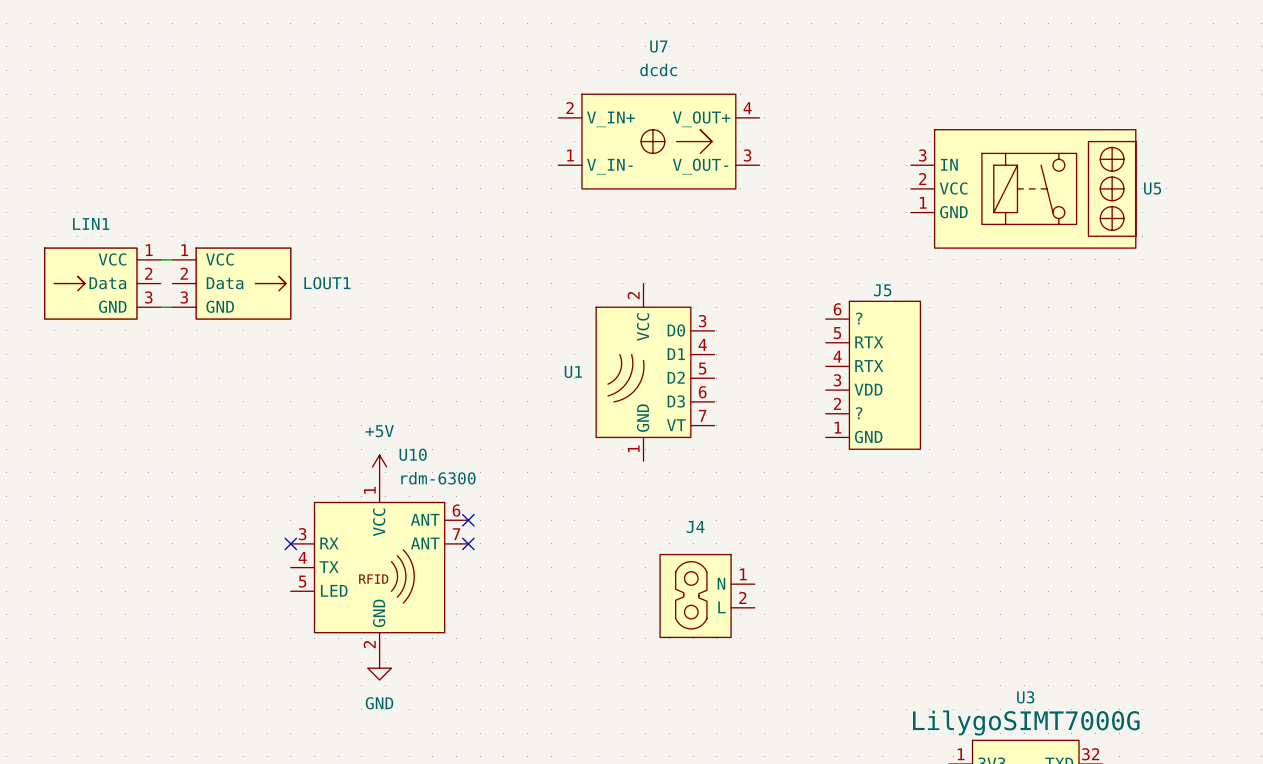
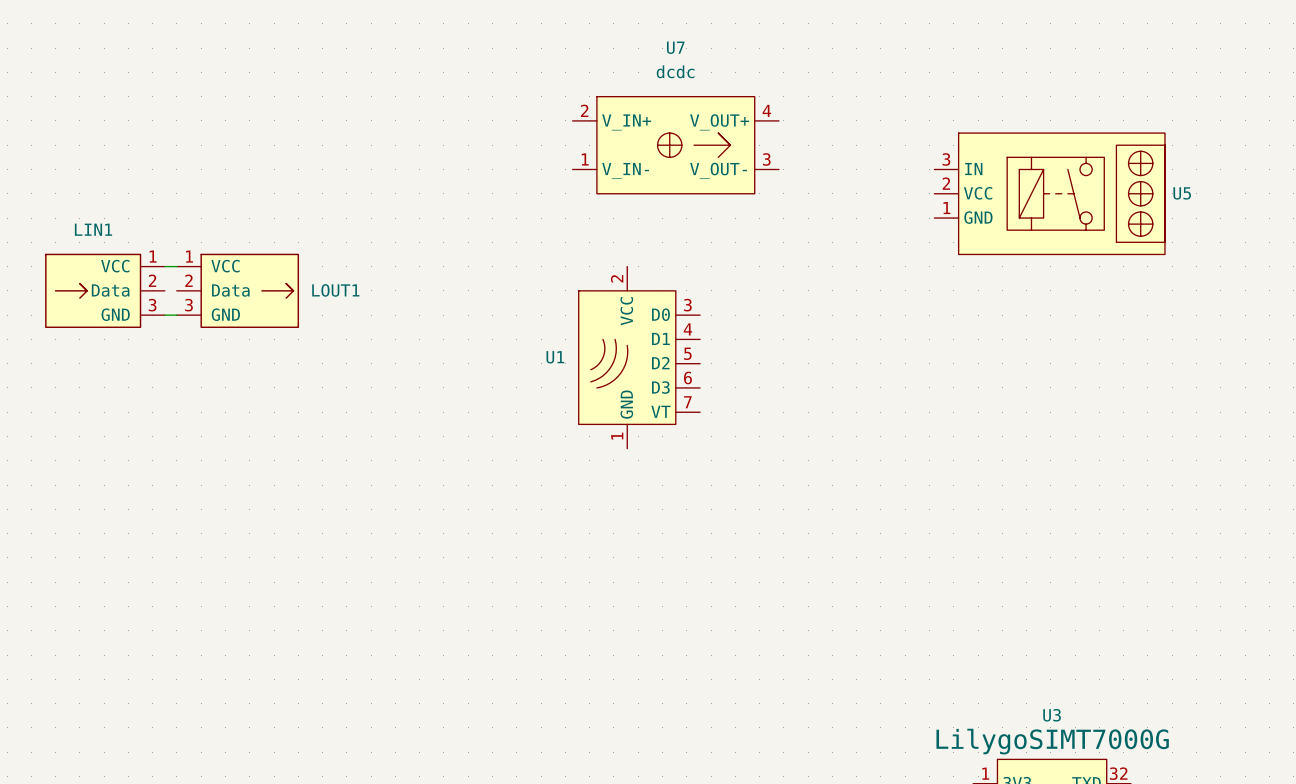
U1 position: (655, 372) -> (639, 357)
J5: (873, 375) -> none
power symbol: +5V (379, 467) -> none
no-connect mark: (468, 520) -> none
no-connect mark: (290, 543) -> none
no-connect mark: (468, 543) -> none
U10: rdm-6300 (379, 567) -> none
J4: (707, 595) -> none
power symbol: GND (379, 668) -> none

